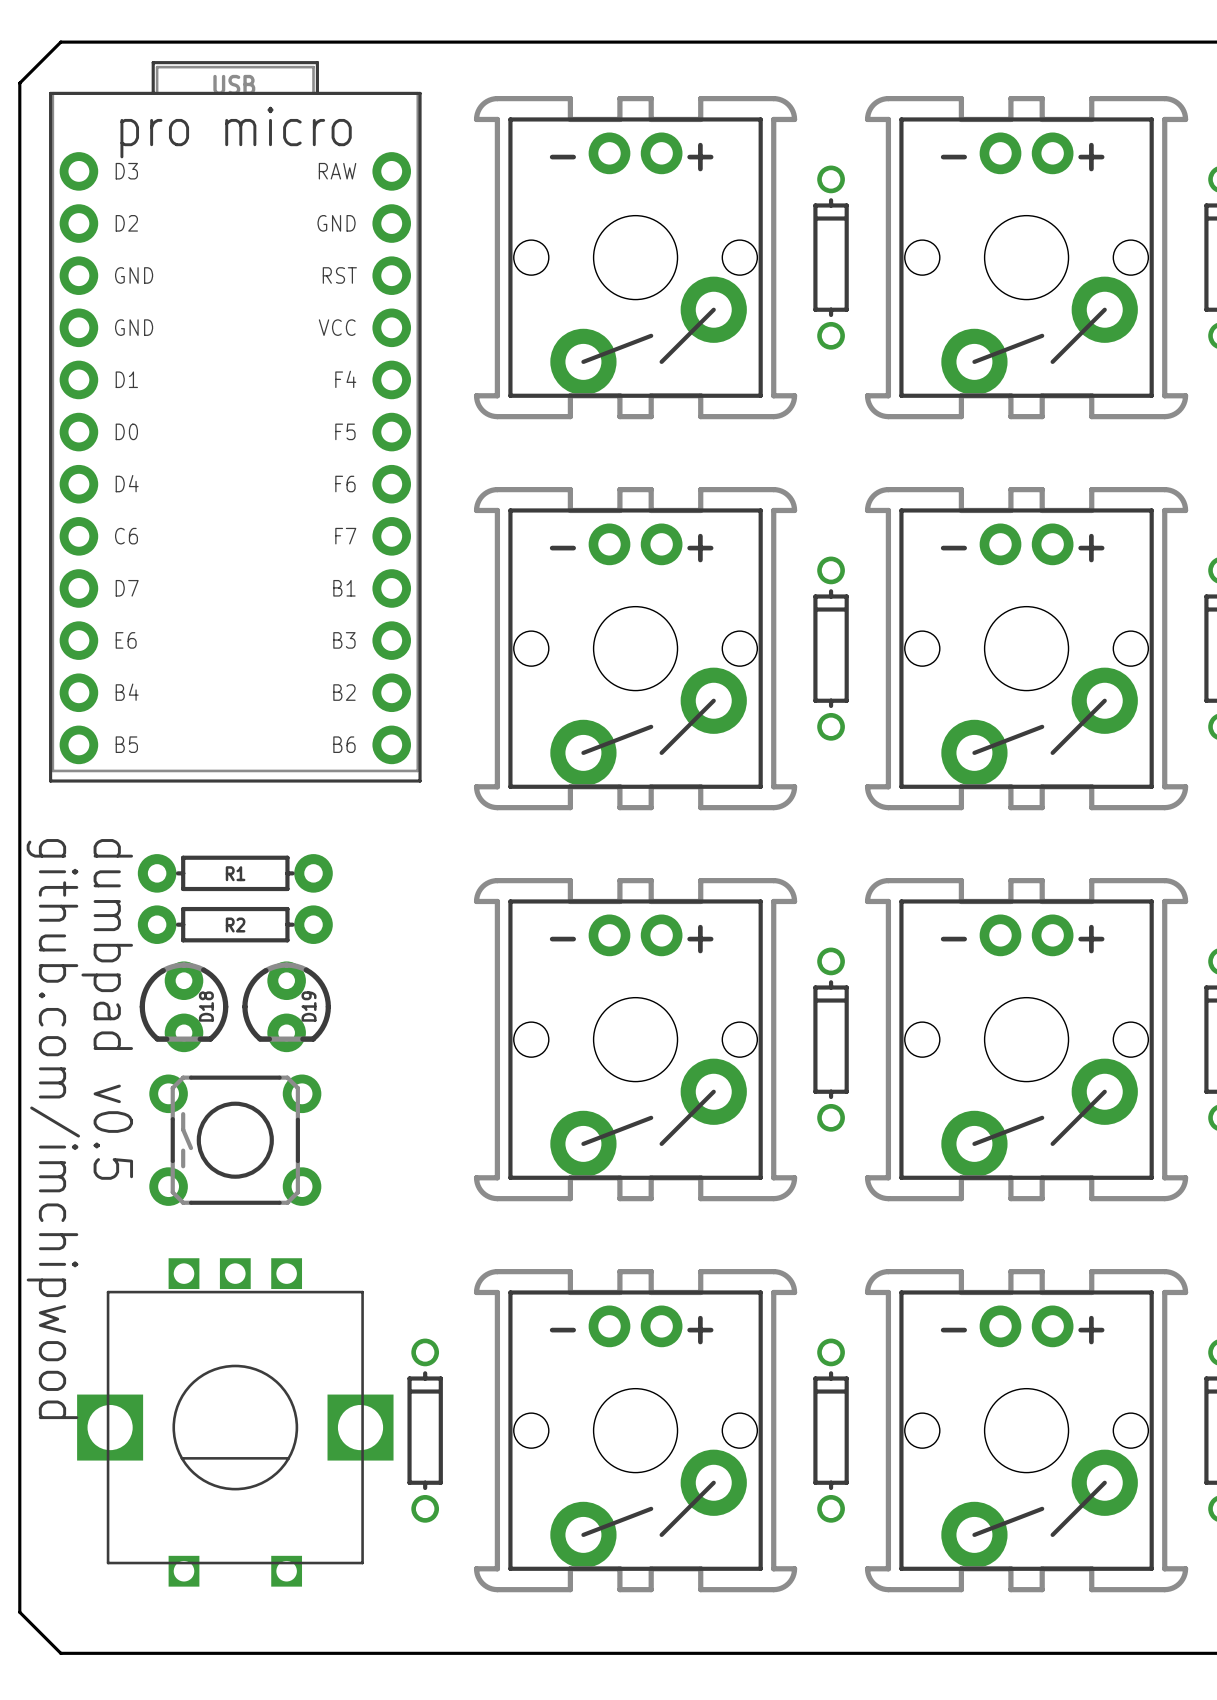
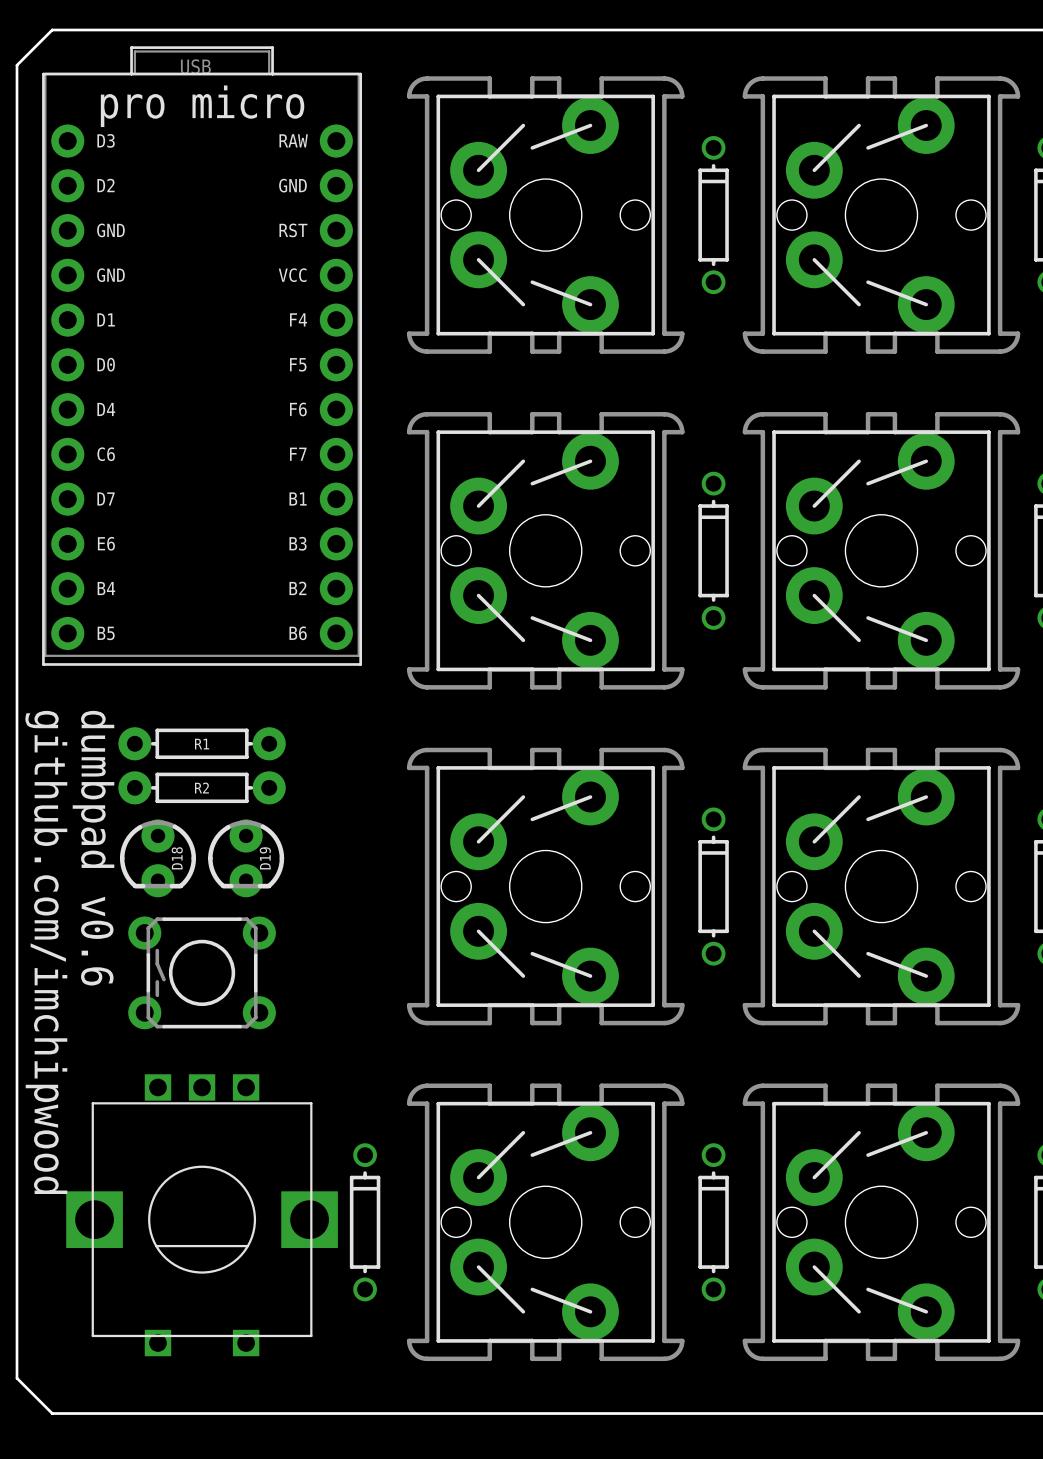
part footprint: [473, 96, 798, 420] -> [406, 76, 685, 354]
part footprint: [864, 96, 1189, 420] -> [742, 76, 1021, 354]
part footprint: [473, 487, 798, 811] -> [406, 412, 685, 690]
part footprint: [864, 487, 1189, 811] -> [742, 412, 1021, 690]
part footprint: [473, 878, 798, 1202] -> [406, 747, 685, 1026]
part footprint: [864, 878, 1189, 1202] -> [742, 747, 1021, 1026]
text: dumbpad v0.5 (107, 1009) -> dumbpad v0.6 (93, 848)
part footprint: [473, 1269, 798, 1593] -> [406, 1083, 685, 1362]
part footprint: [864, 1269, 1189, 1593] -> [742, 1083, 1021, 1362]

